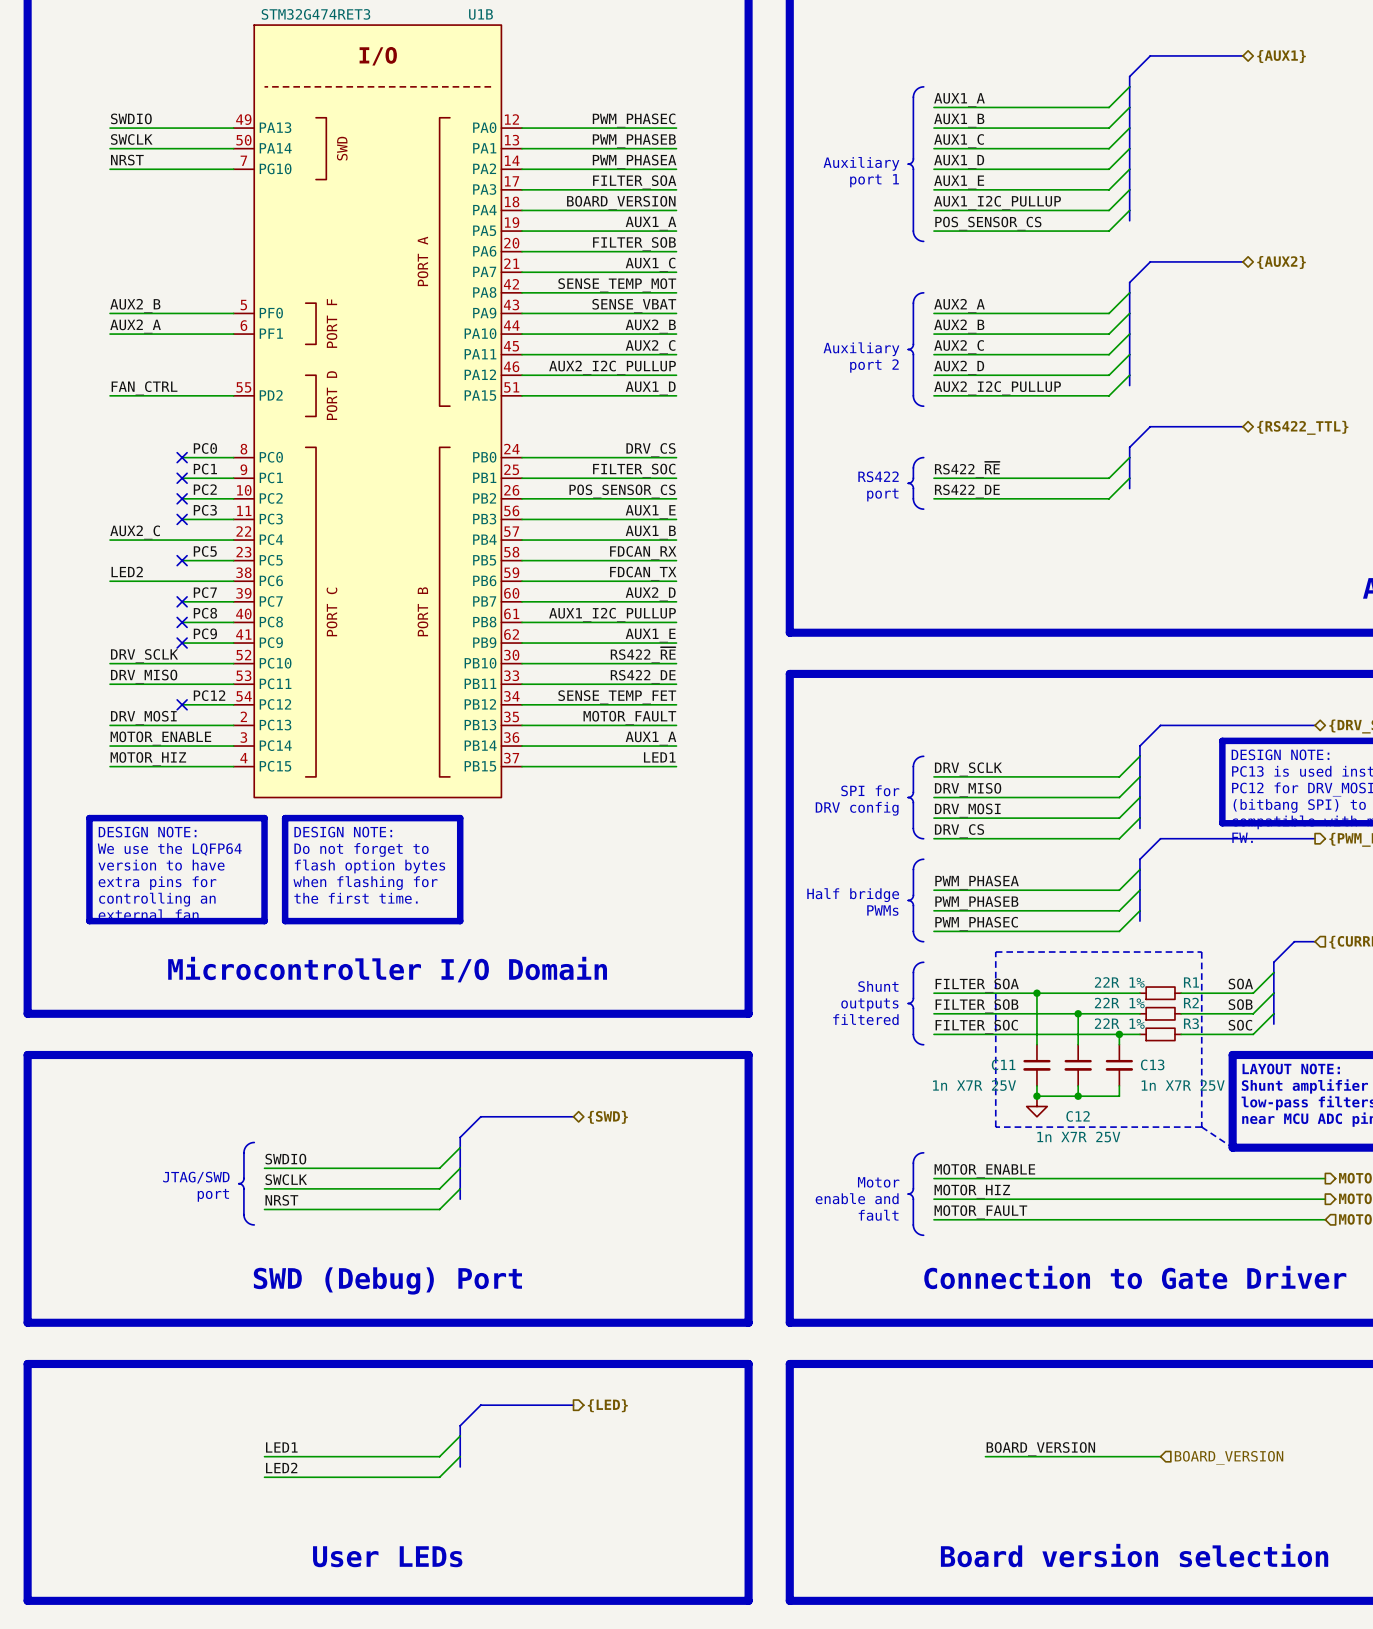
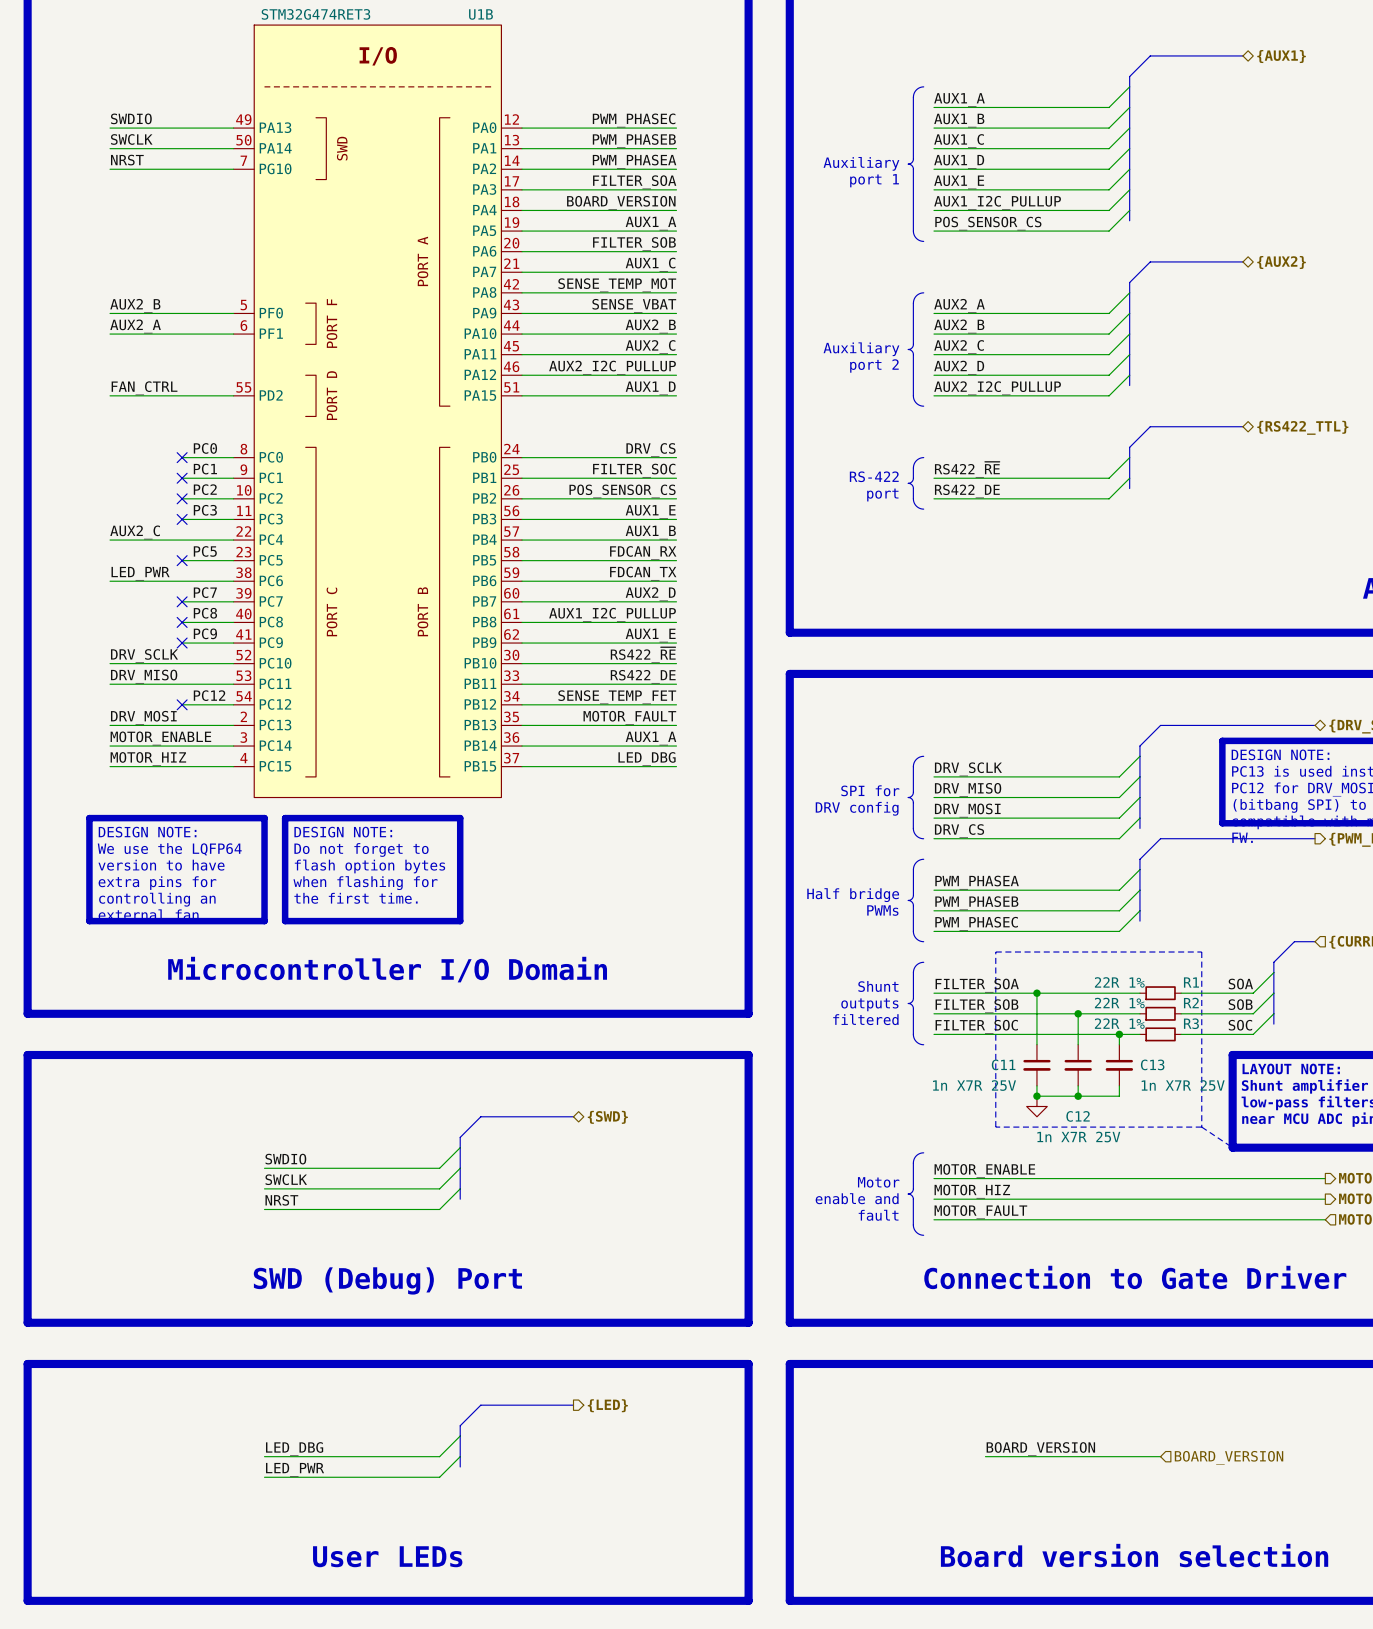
text: RS422 (878, 476) -> RS-422 (874, 476)
label: LED2 (127, 571) -> LED_PWR (140, 573)
label: LED1 (659, 757) -> LED_DBG (647, 759)
line: (254, 1142) (248, 1144) (244, 1150) (243, 1179) (238, 1183) (243, 1188) -> none
text: JTAG/SWD (196, 1177) -> none
line: (243, 1188) (244, 1217) (247, 1222) (254, 1224) -> none
text: port (213, 1195) -> none
label: LED1 (281, 1447) -> LED_DBG (294, 1449)
label: LED2 (281, 1467) -> LED_PWR (295, 1469)

